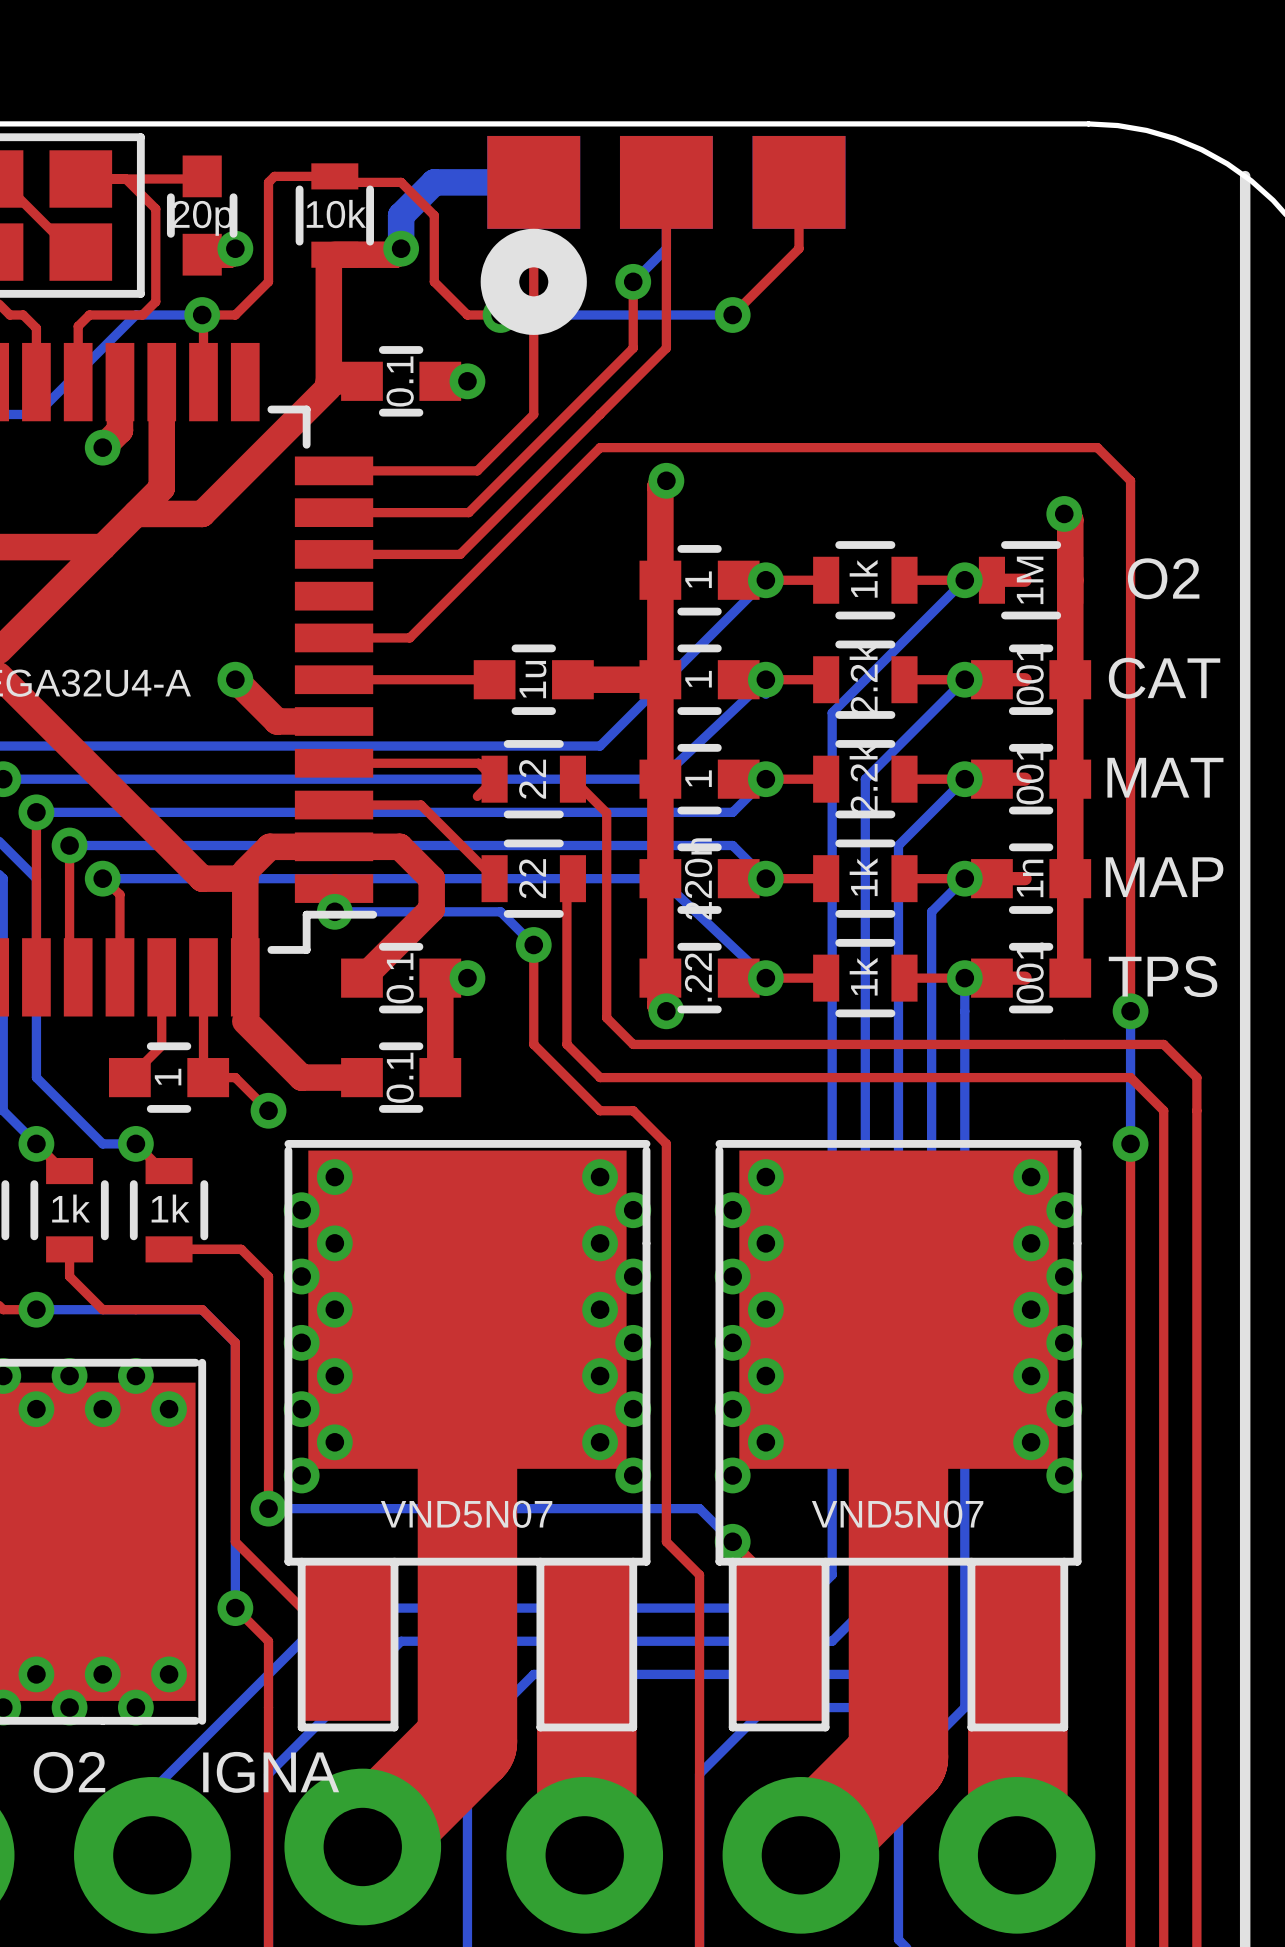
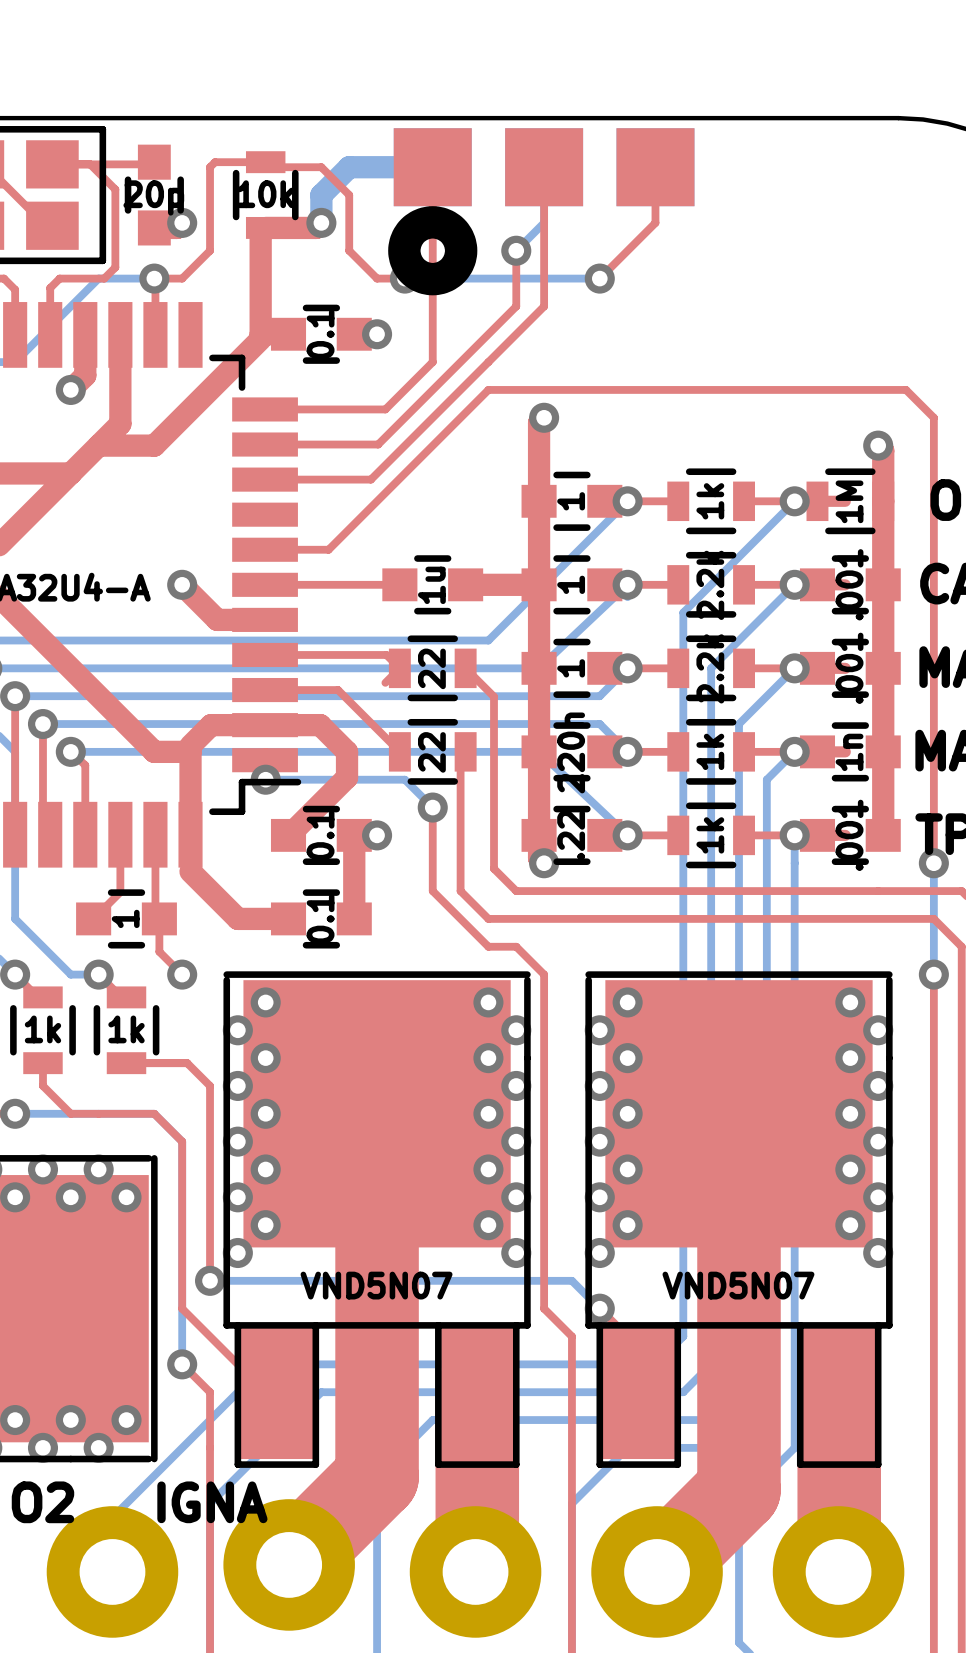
top track: (208, 1077) (235, 1077) (268, 1110) -> (159, 918) (159, 951) (182, 974)
via position: (268, 1110) -> (182, 974)

